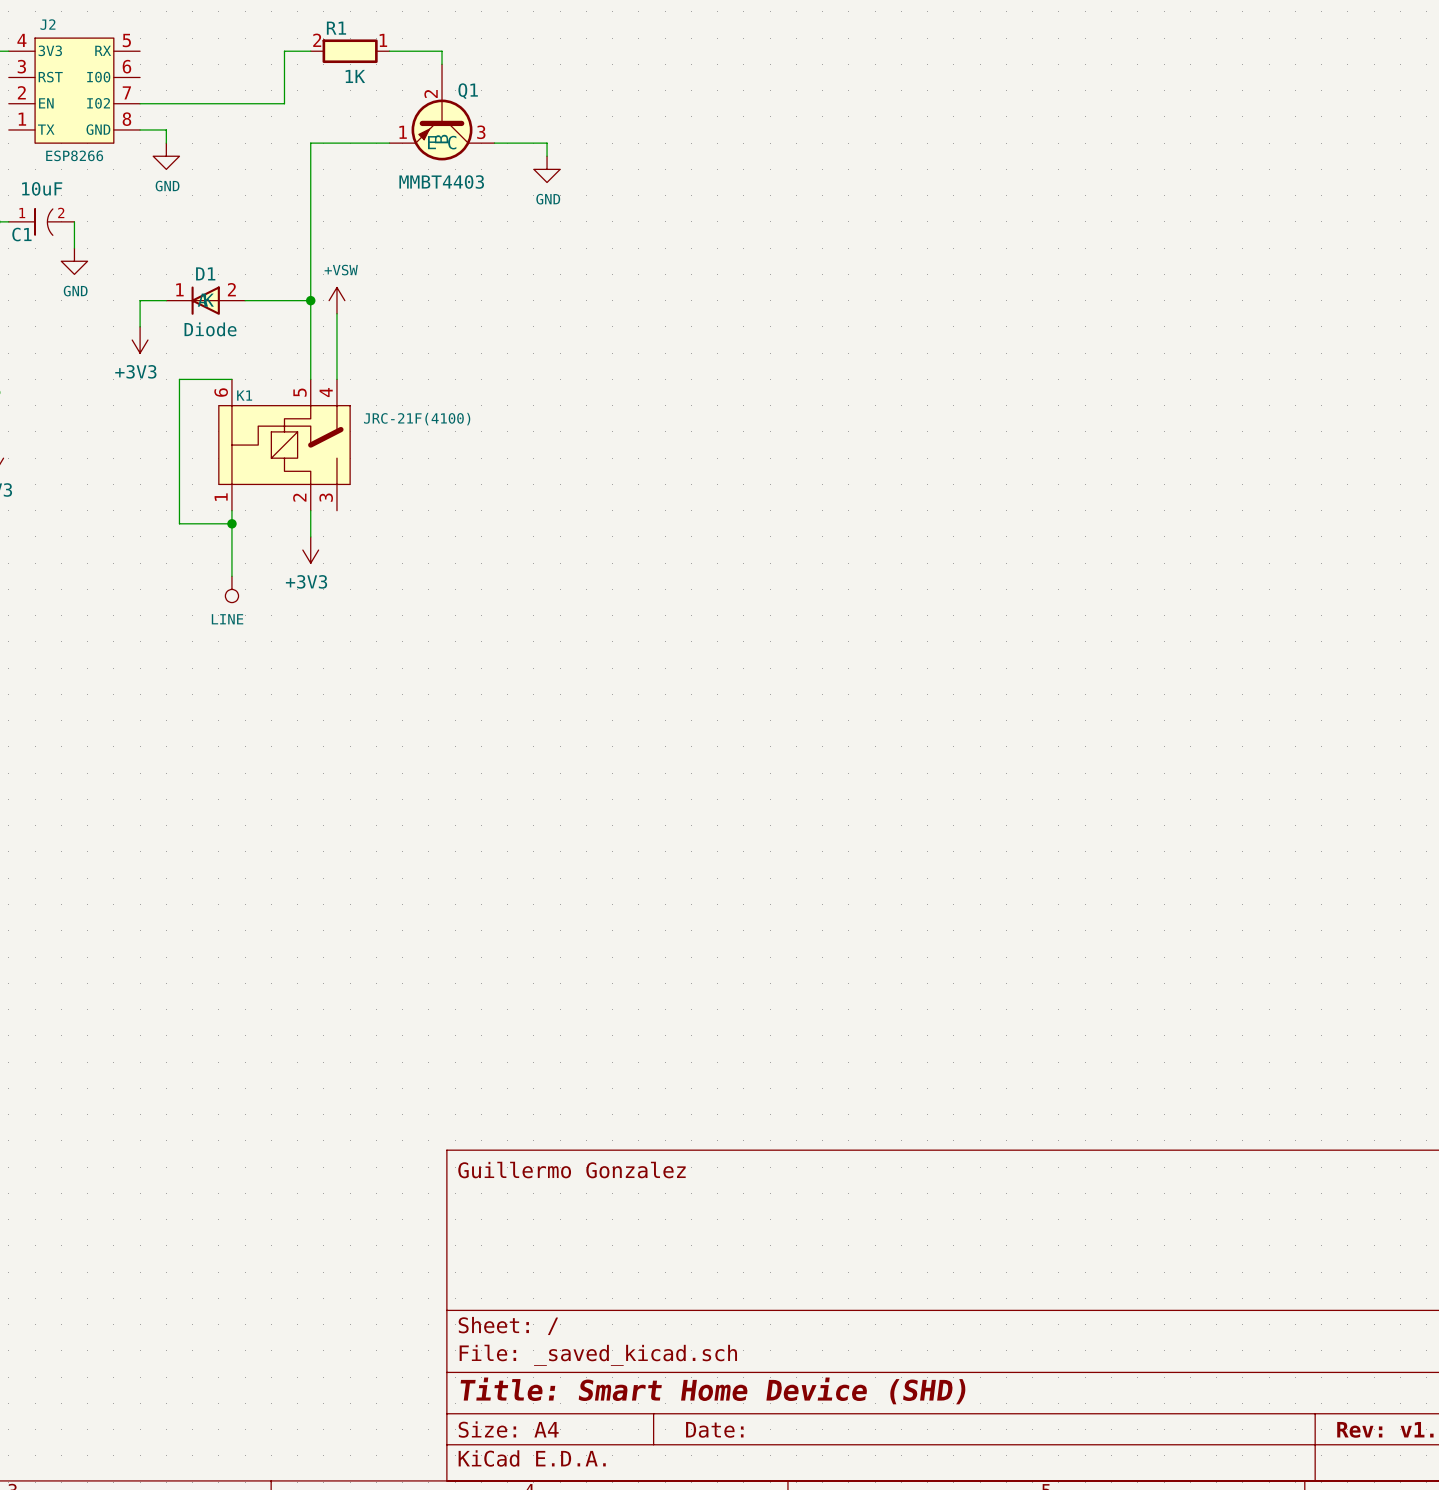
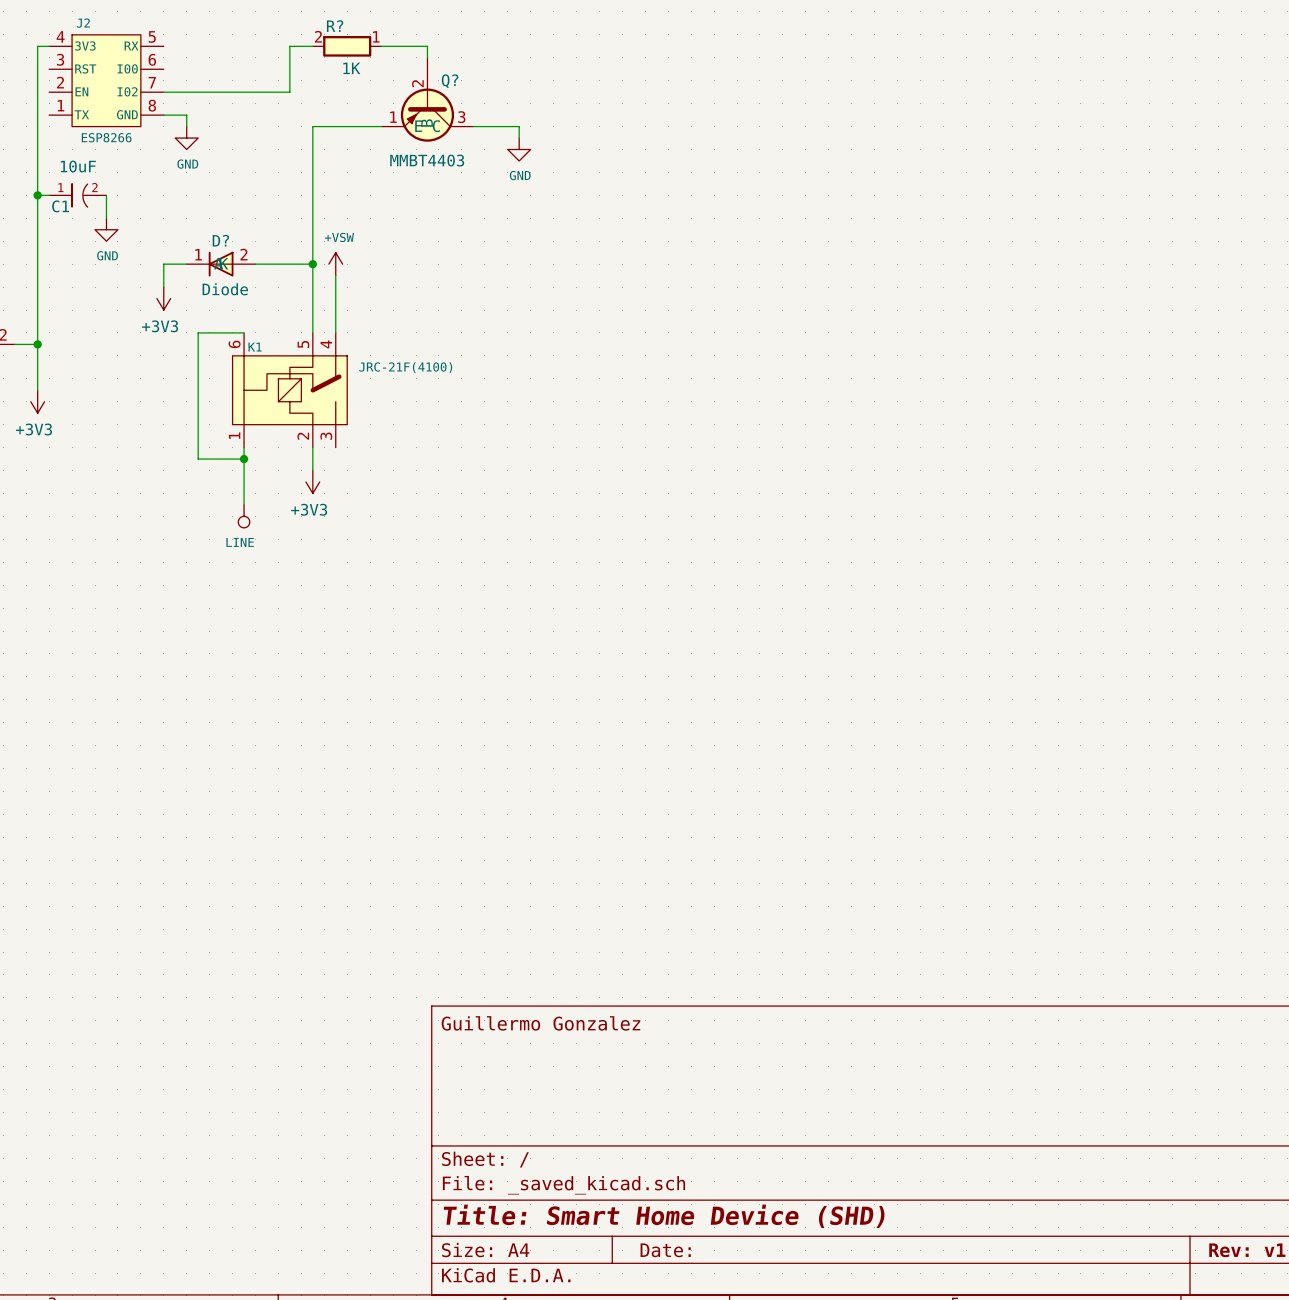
R1 name: R1 (336, 28) -> R? (335, 26)
Q1 name: Q1 (468, 91) -> Q? (450, 81)
D1 name: D1 (205, 273) -> D? (220, 240)

